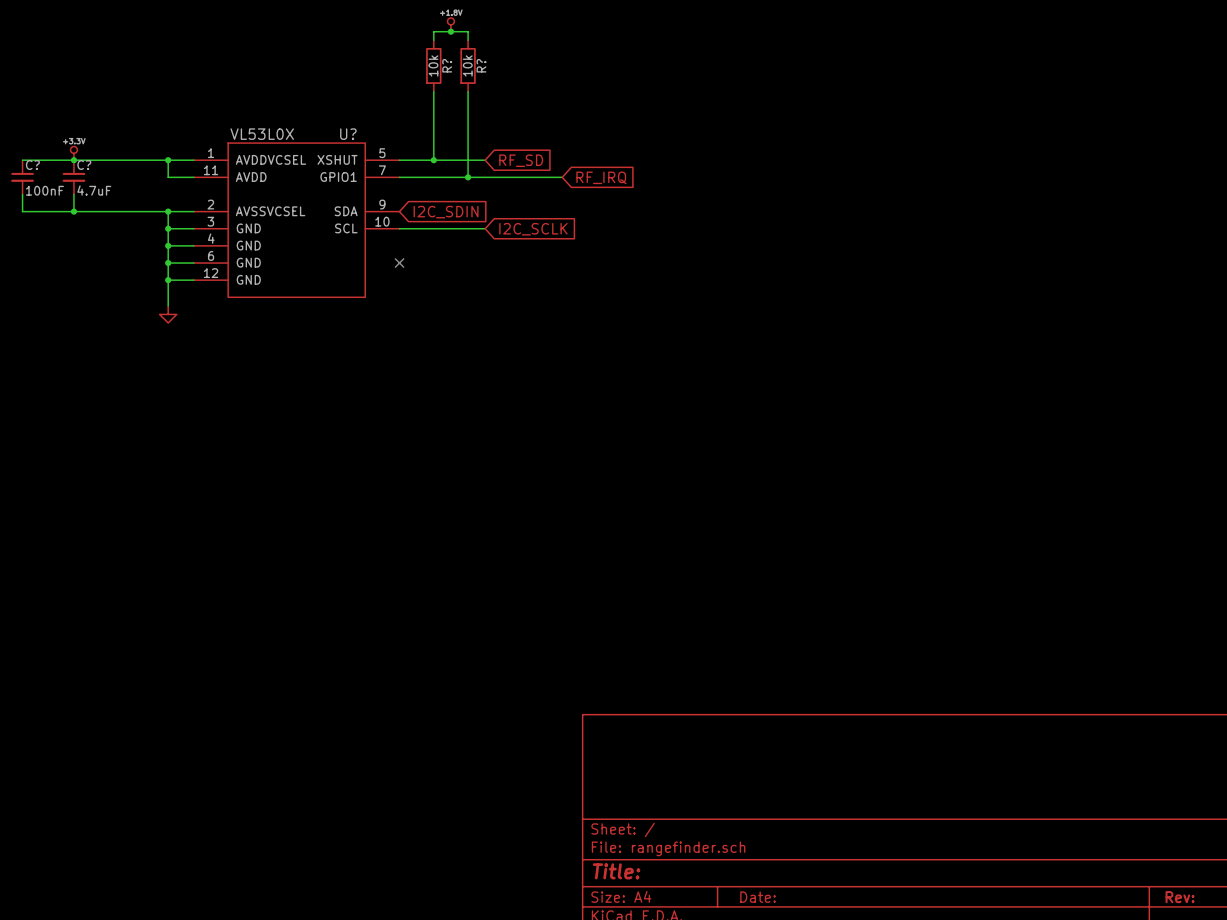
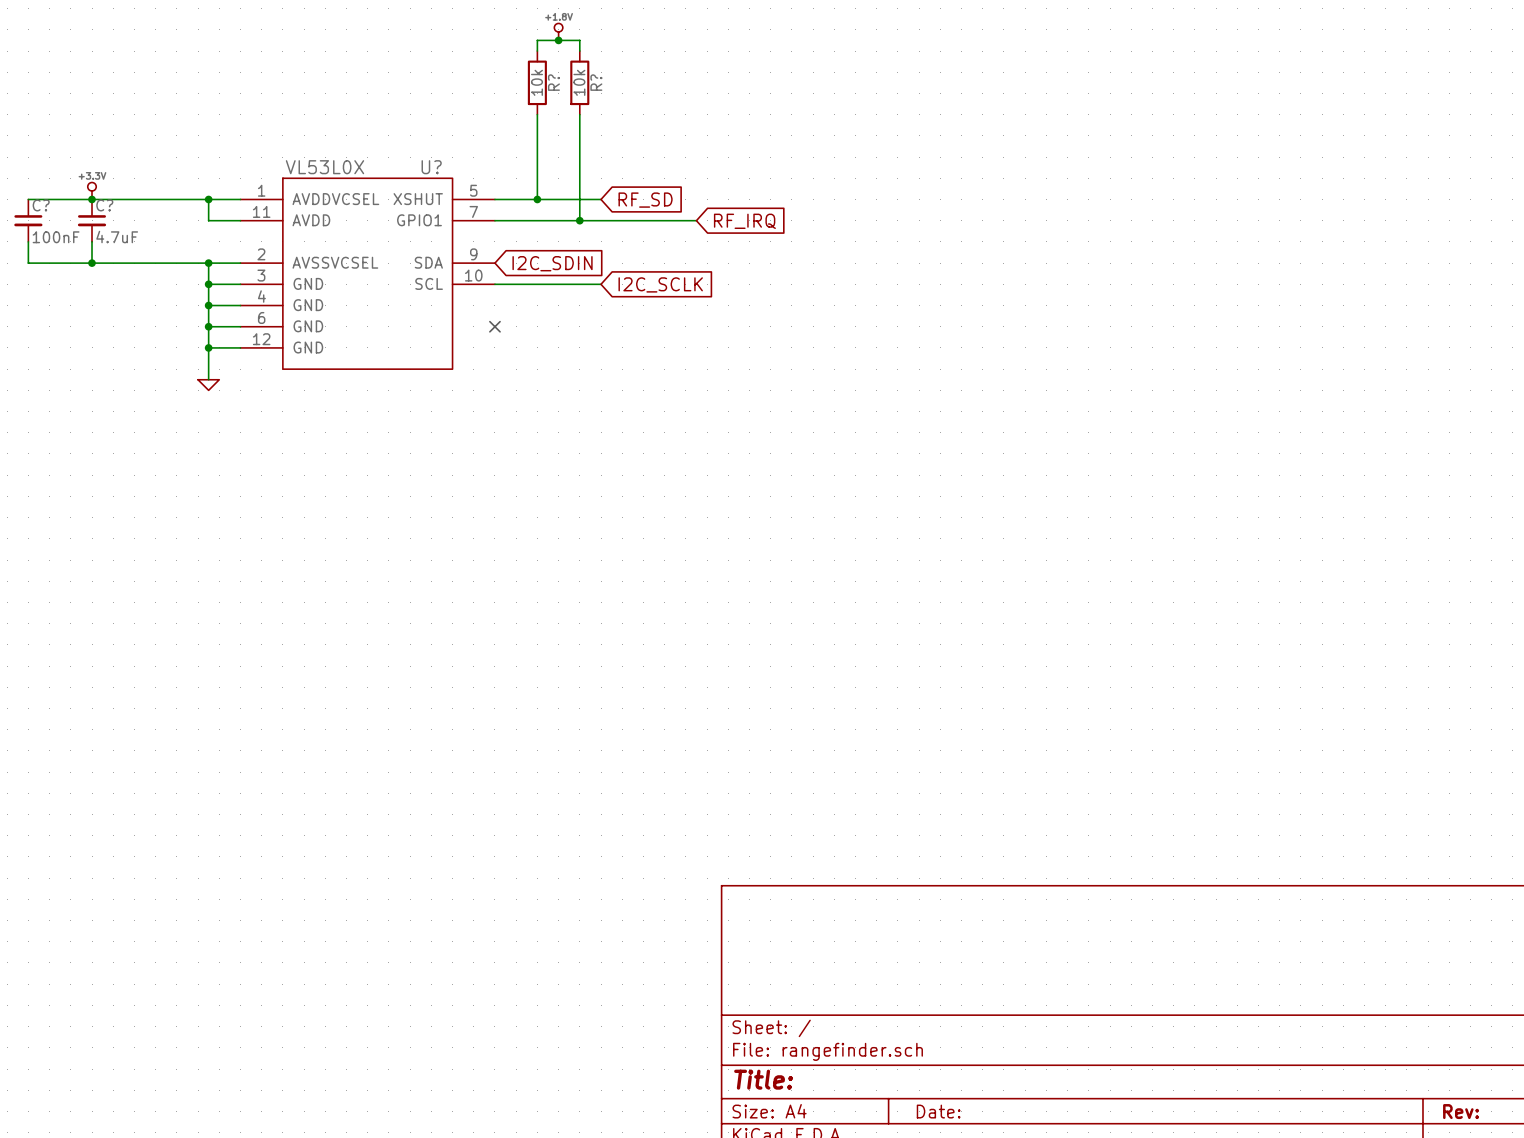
power symbol shape: [159, 305, 177, 323] -> [198, 379, 220, 391]

